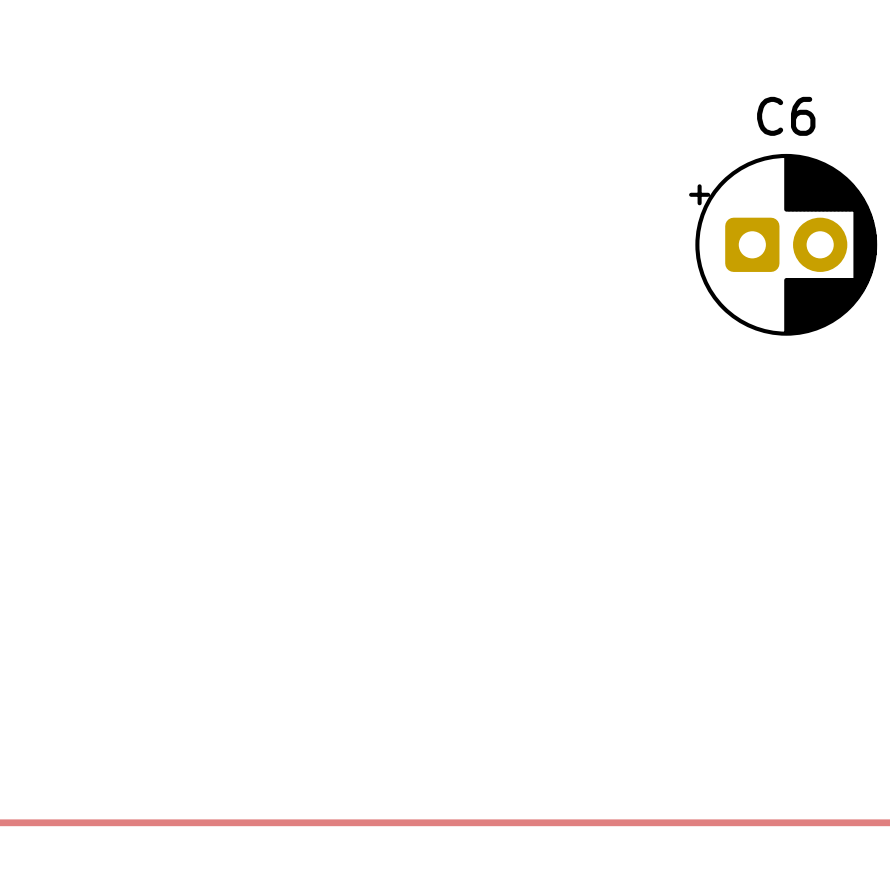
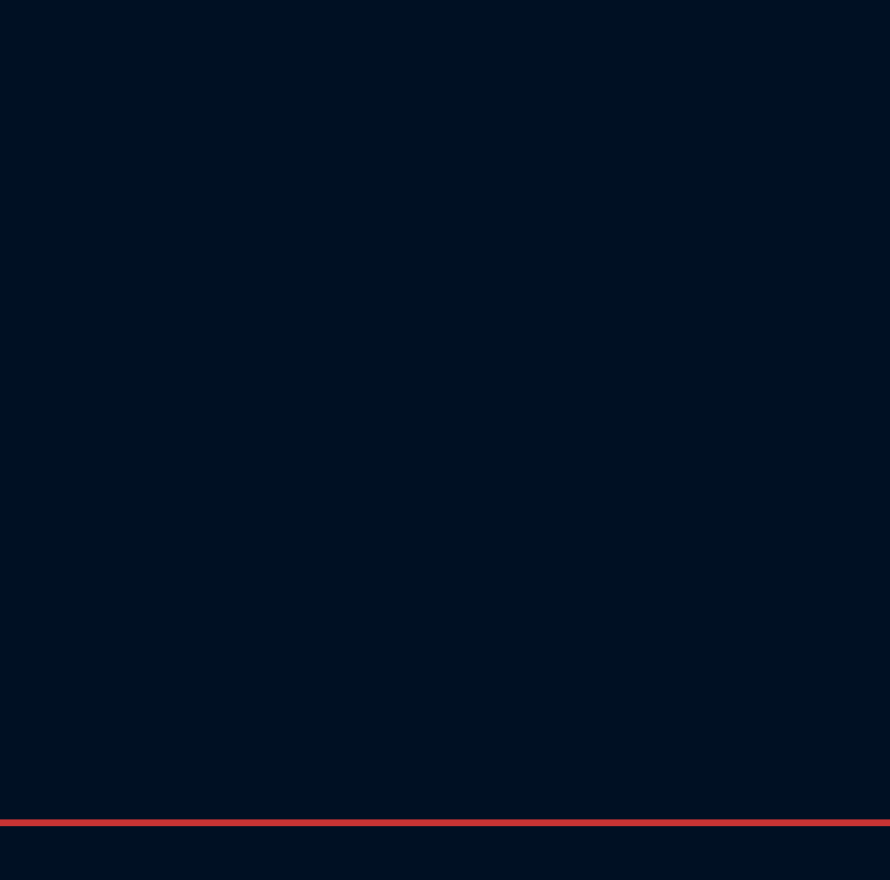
C6: (783, 244) -> none

